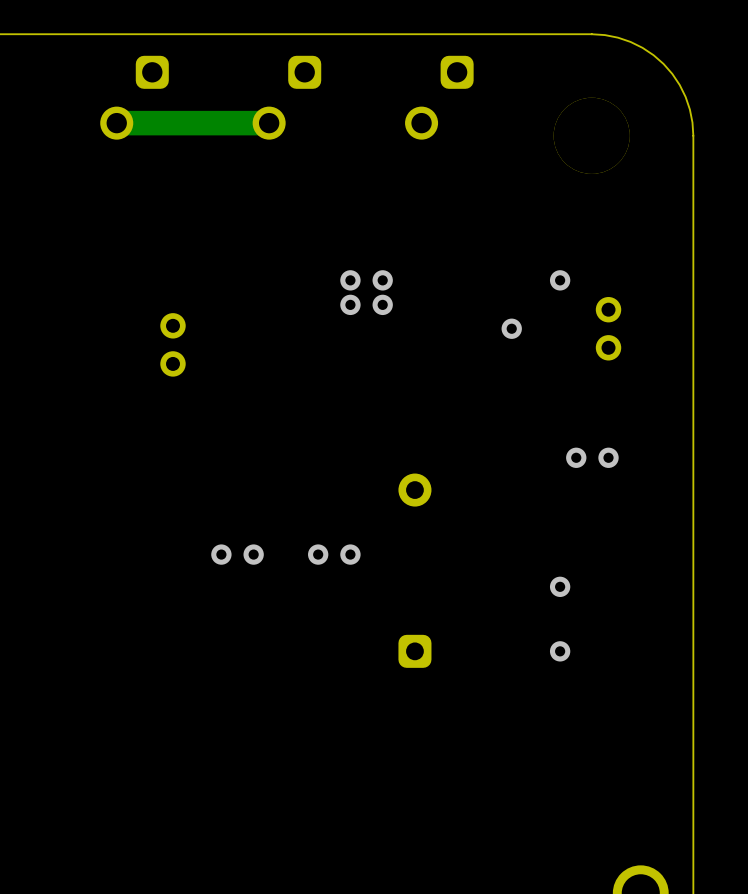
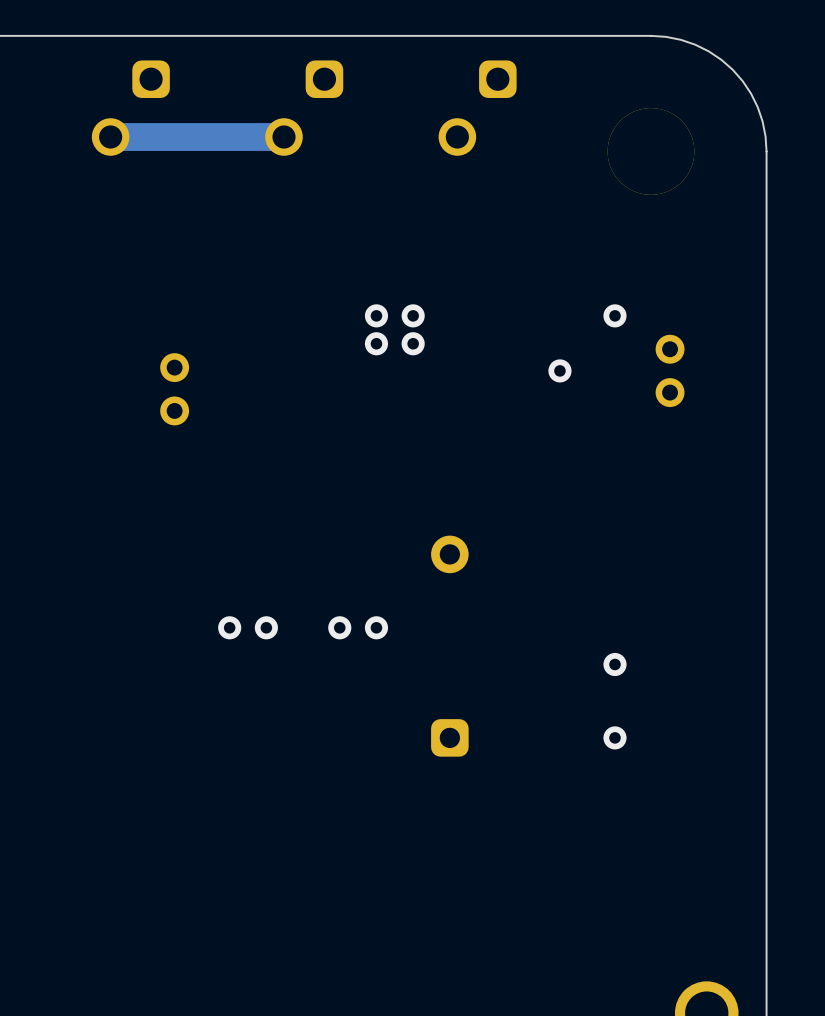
via: (576, 457) -> none
via: (608, 457) -> none

